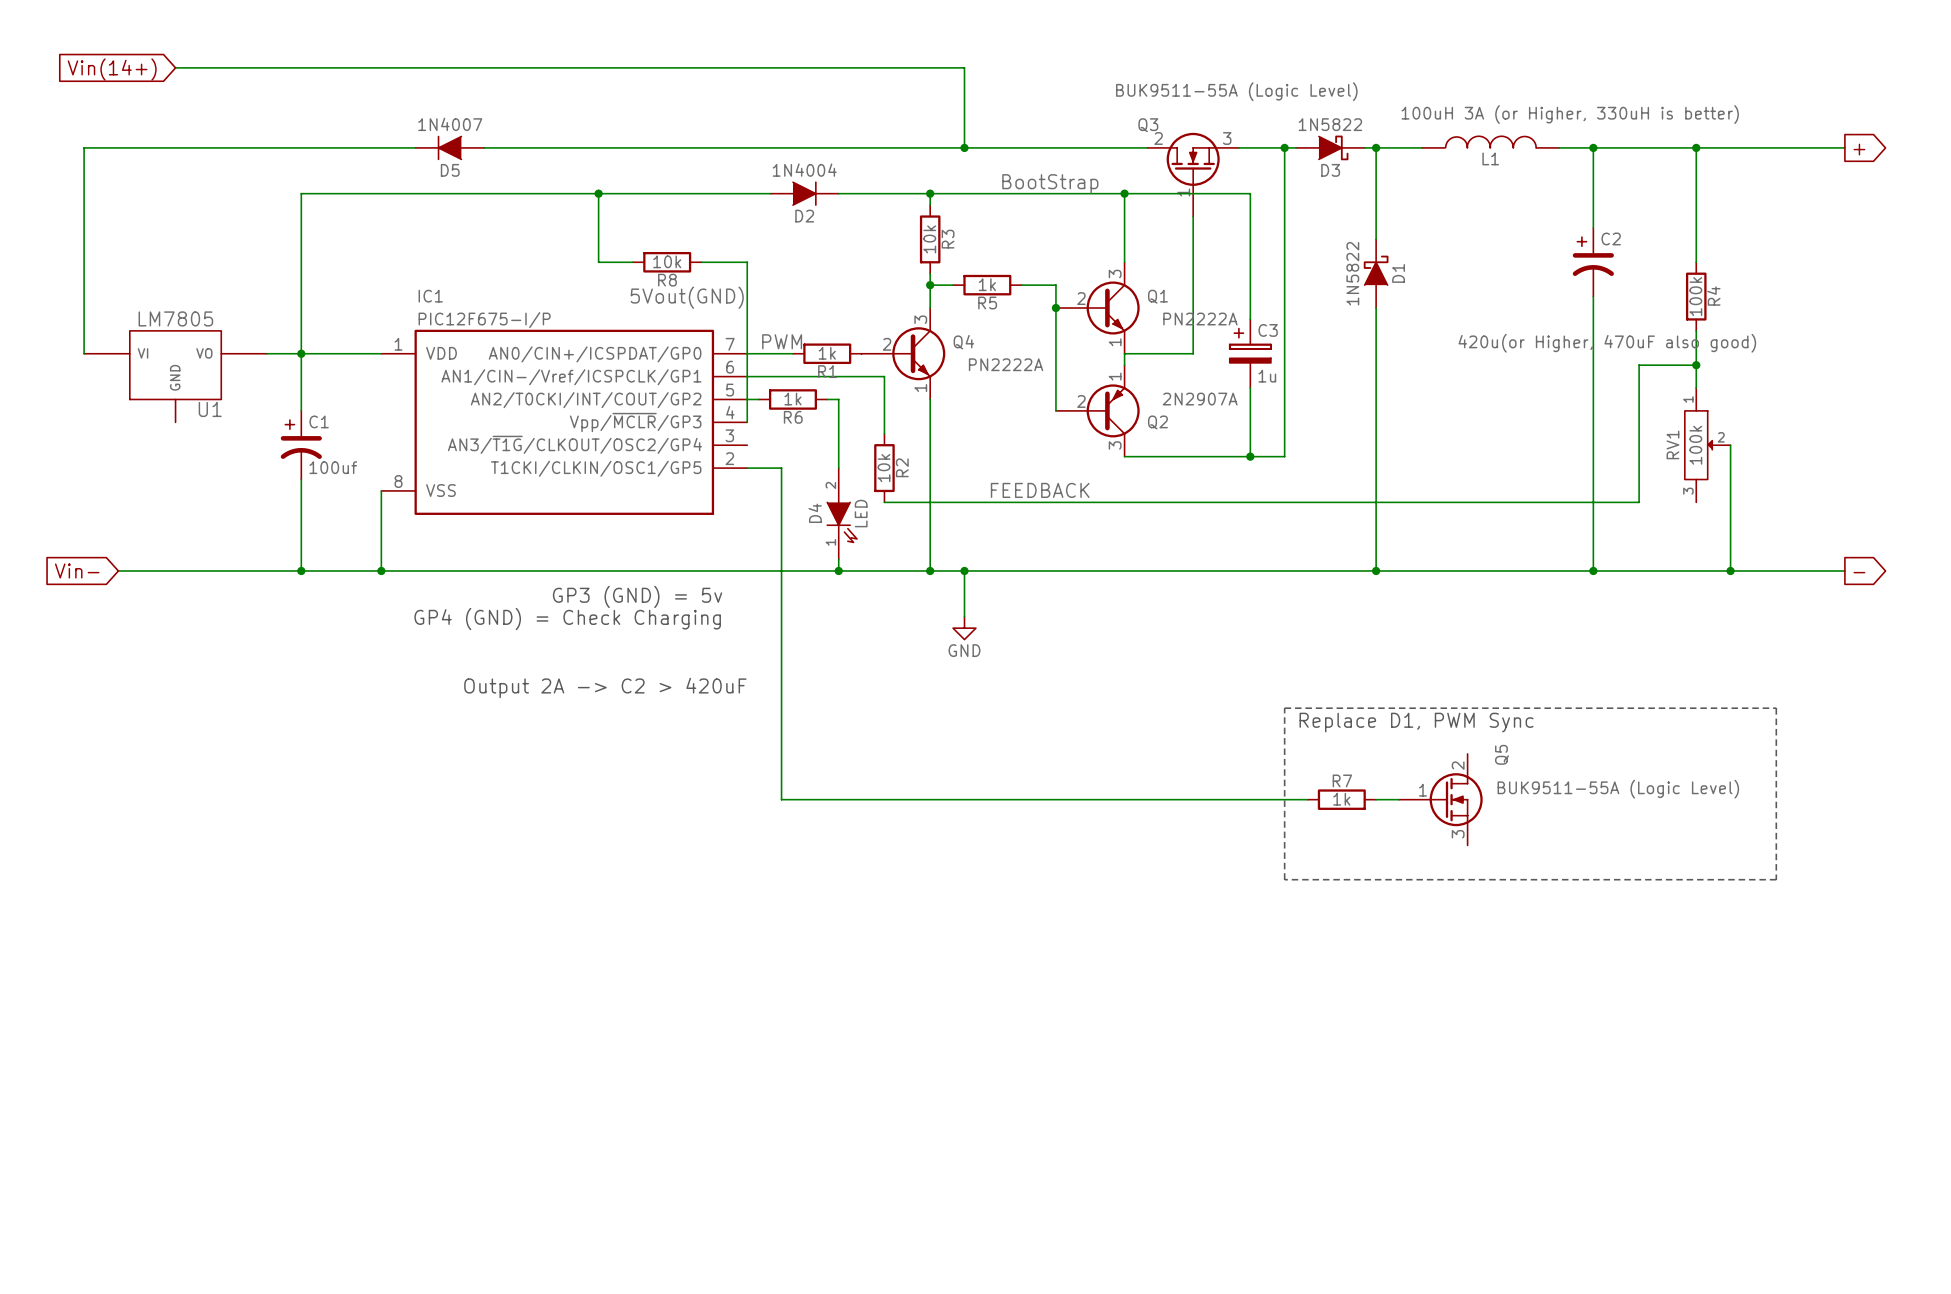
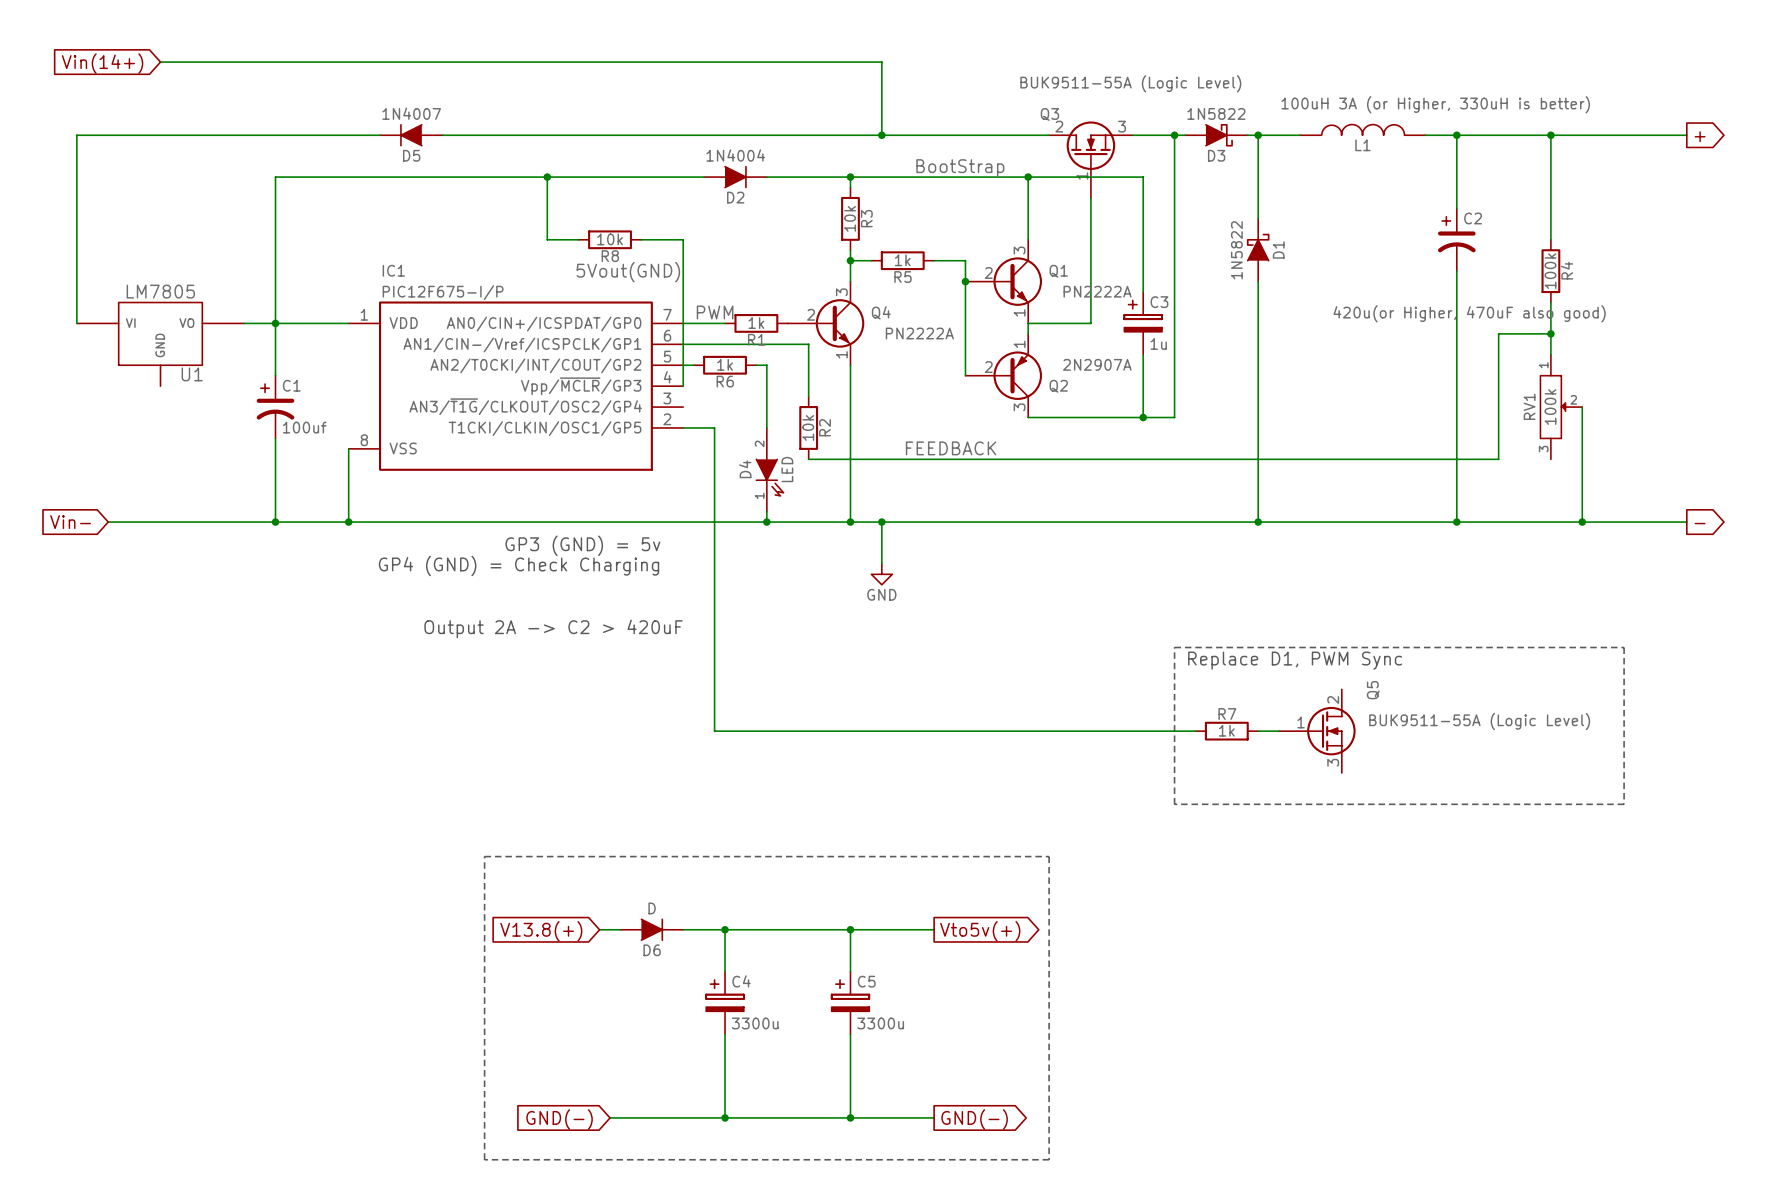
line: none -> (484, 856) (1049, 856) (1049, 1159) (484, 1159) (484, 856)
wire: none -> (599, 929) (620, 929)
D6: none -> D (651, 929)
wire: none -> (683, 929) (934, 929)
wire: none -> (725, 929) (725, 971)
junction: none -> (725, 929)
wire: none -> (850, 929) (850, 971)
junction: none -> (850, 929)
global label: none -> V13.8(+) (541, 931)
global label: none -> Vto5v(+) (980, 931)
C4: none -> 3300u (725, 1002)
C5: none -> 3300u (850, 1002)
wire: none -> (725, 1034) (725, 1117)
wire: none -> (850, 1034) (850, 1117)
wire: none -> (610, 1117) (934, 1117)
junction: none -> (725, 1117)
junction: none -> (850, 1117)
global label: none -> GND(-) (559, 1119)
global label: none -> GND(-) (974, 1119)

